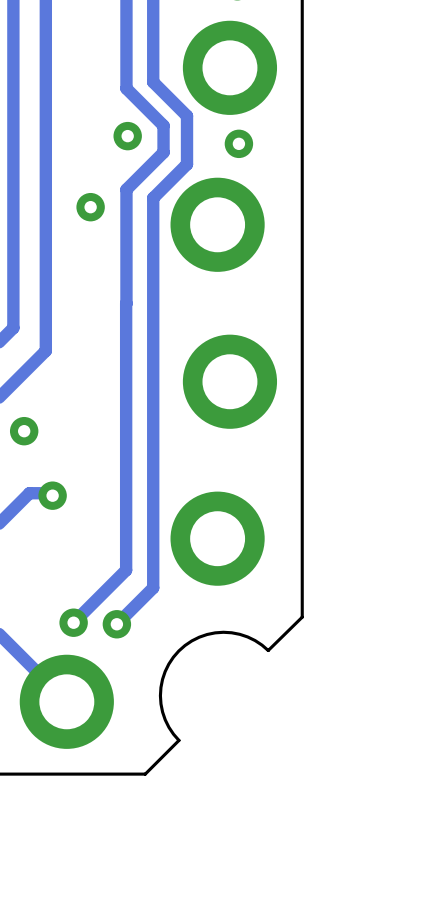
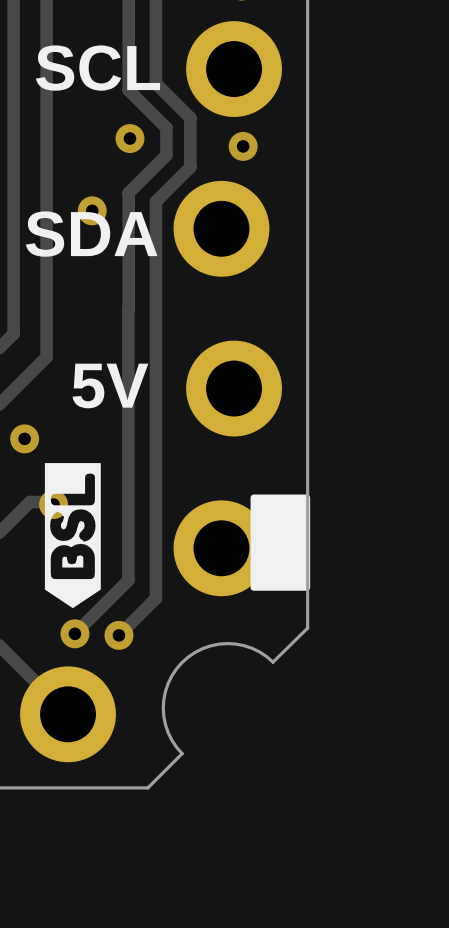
text: none -> SCL (97, 68)
text: none -> SDA (91, 234)
text: none -> 5V (110, 385)
drawing: none -> [44, 463, 101, 609]
drawing: none -> [250, 494, 311, 591]

